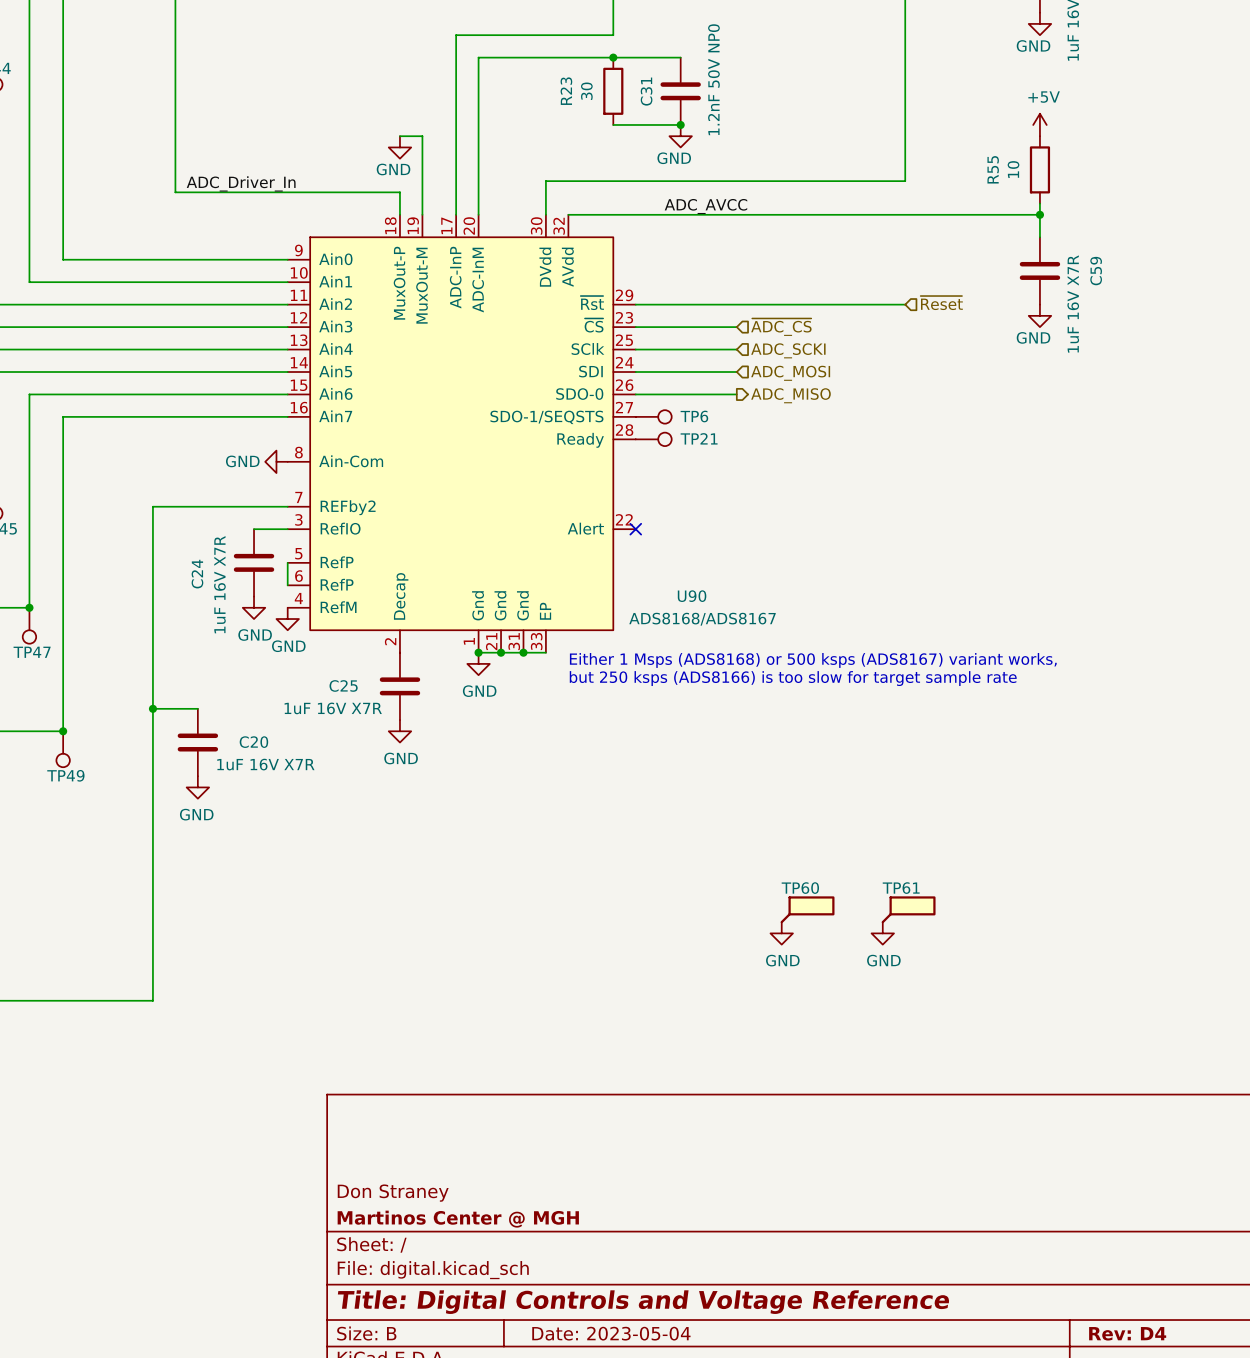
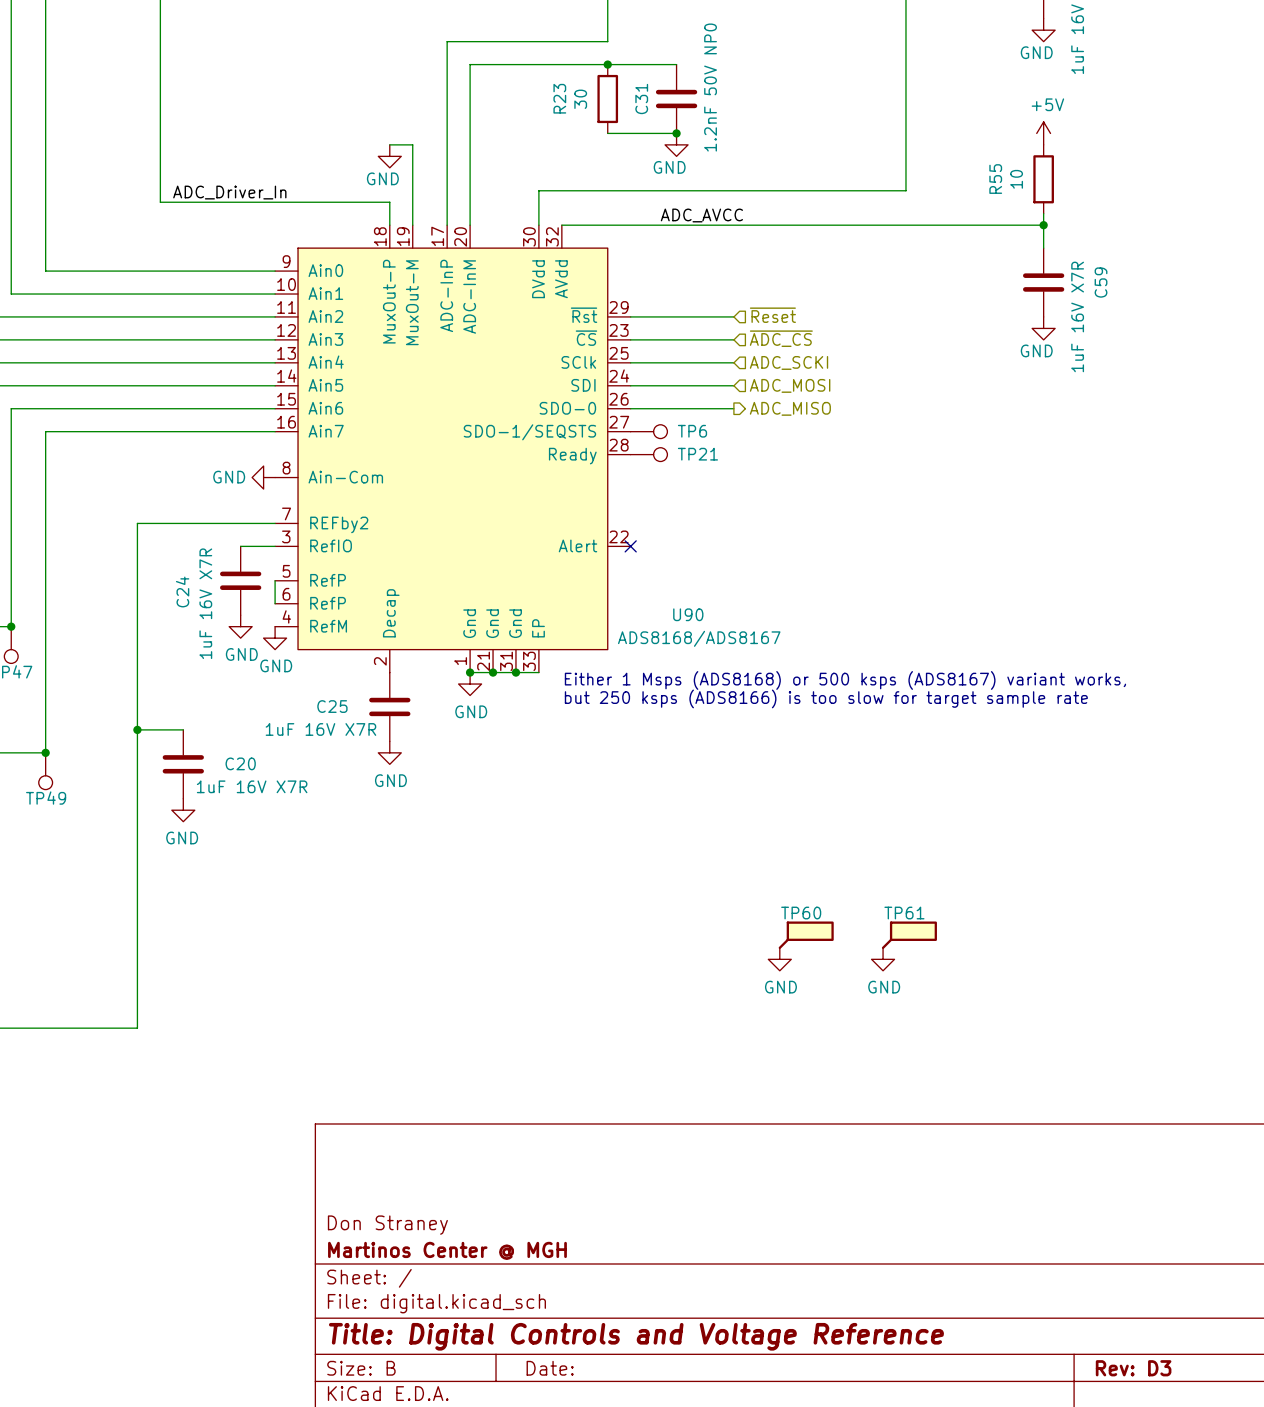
hierarchical label position: ~{Reset} (941, 303) -> ~{Reset} (772, 315)
wire: (736, 304) (905, 304) -> none
title block: Date: 2023-05-04 (611, 1333) -> Date: (550, 1368)
title block: Rev: D4 (1127, 1333) -> Rev: D3 (1133, 1368)

